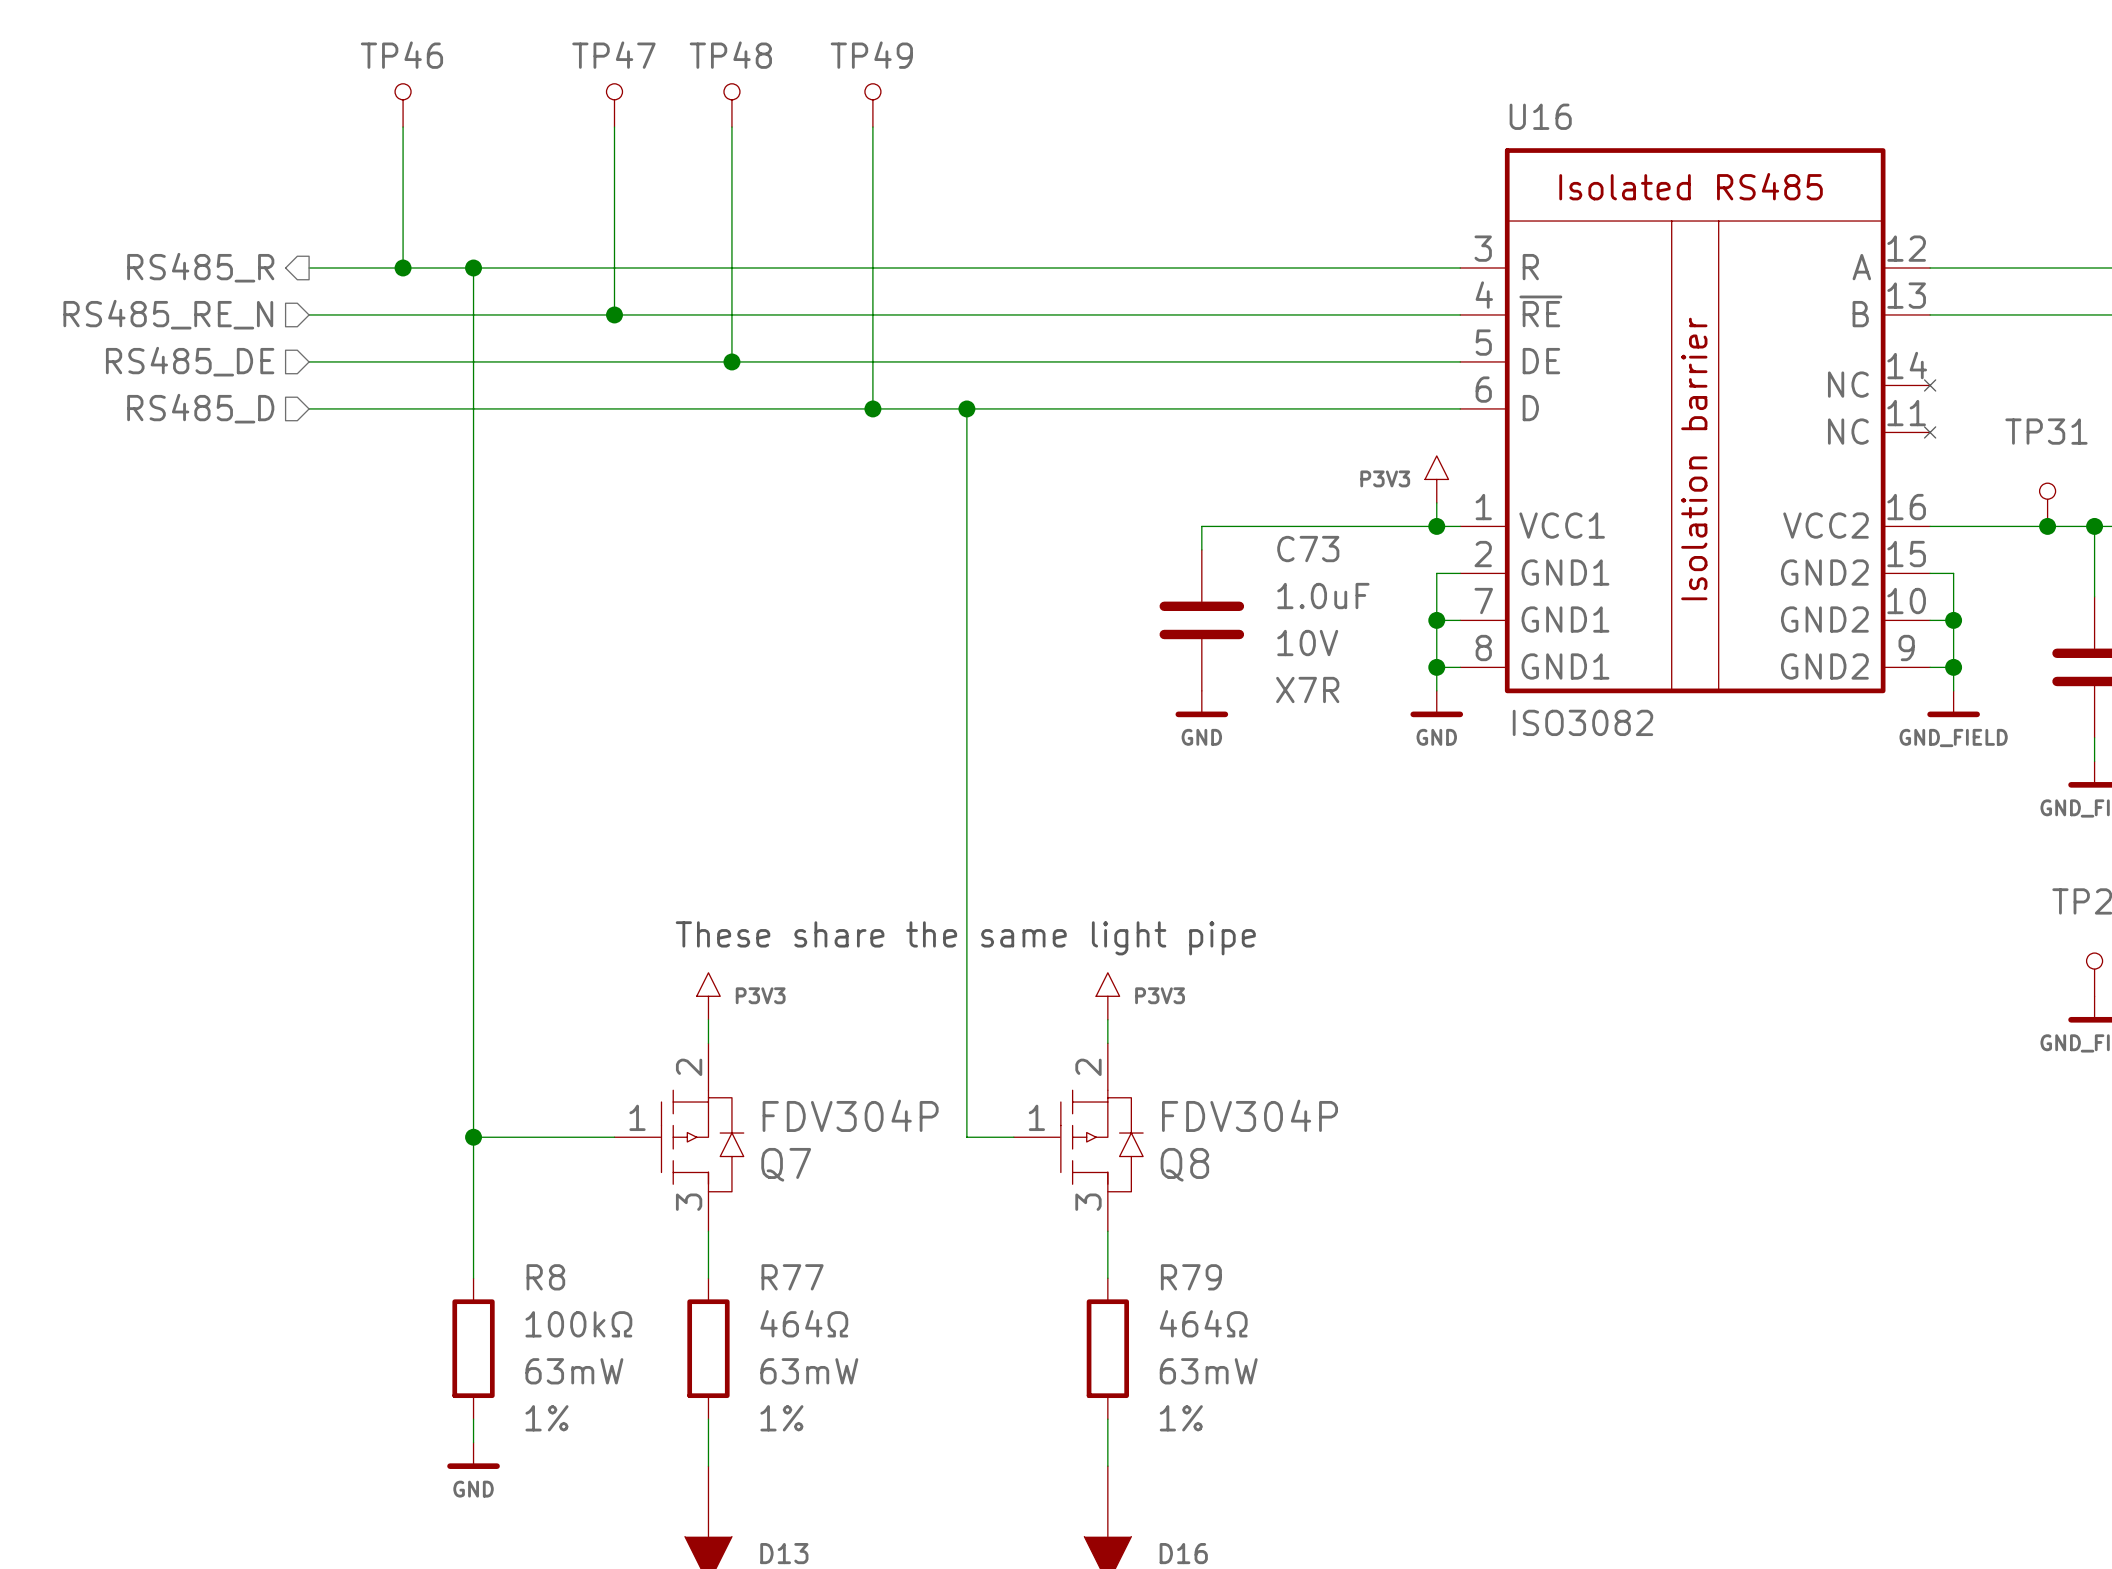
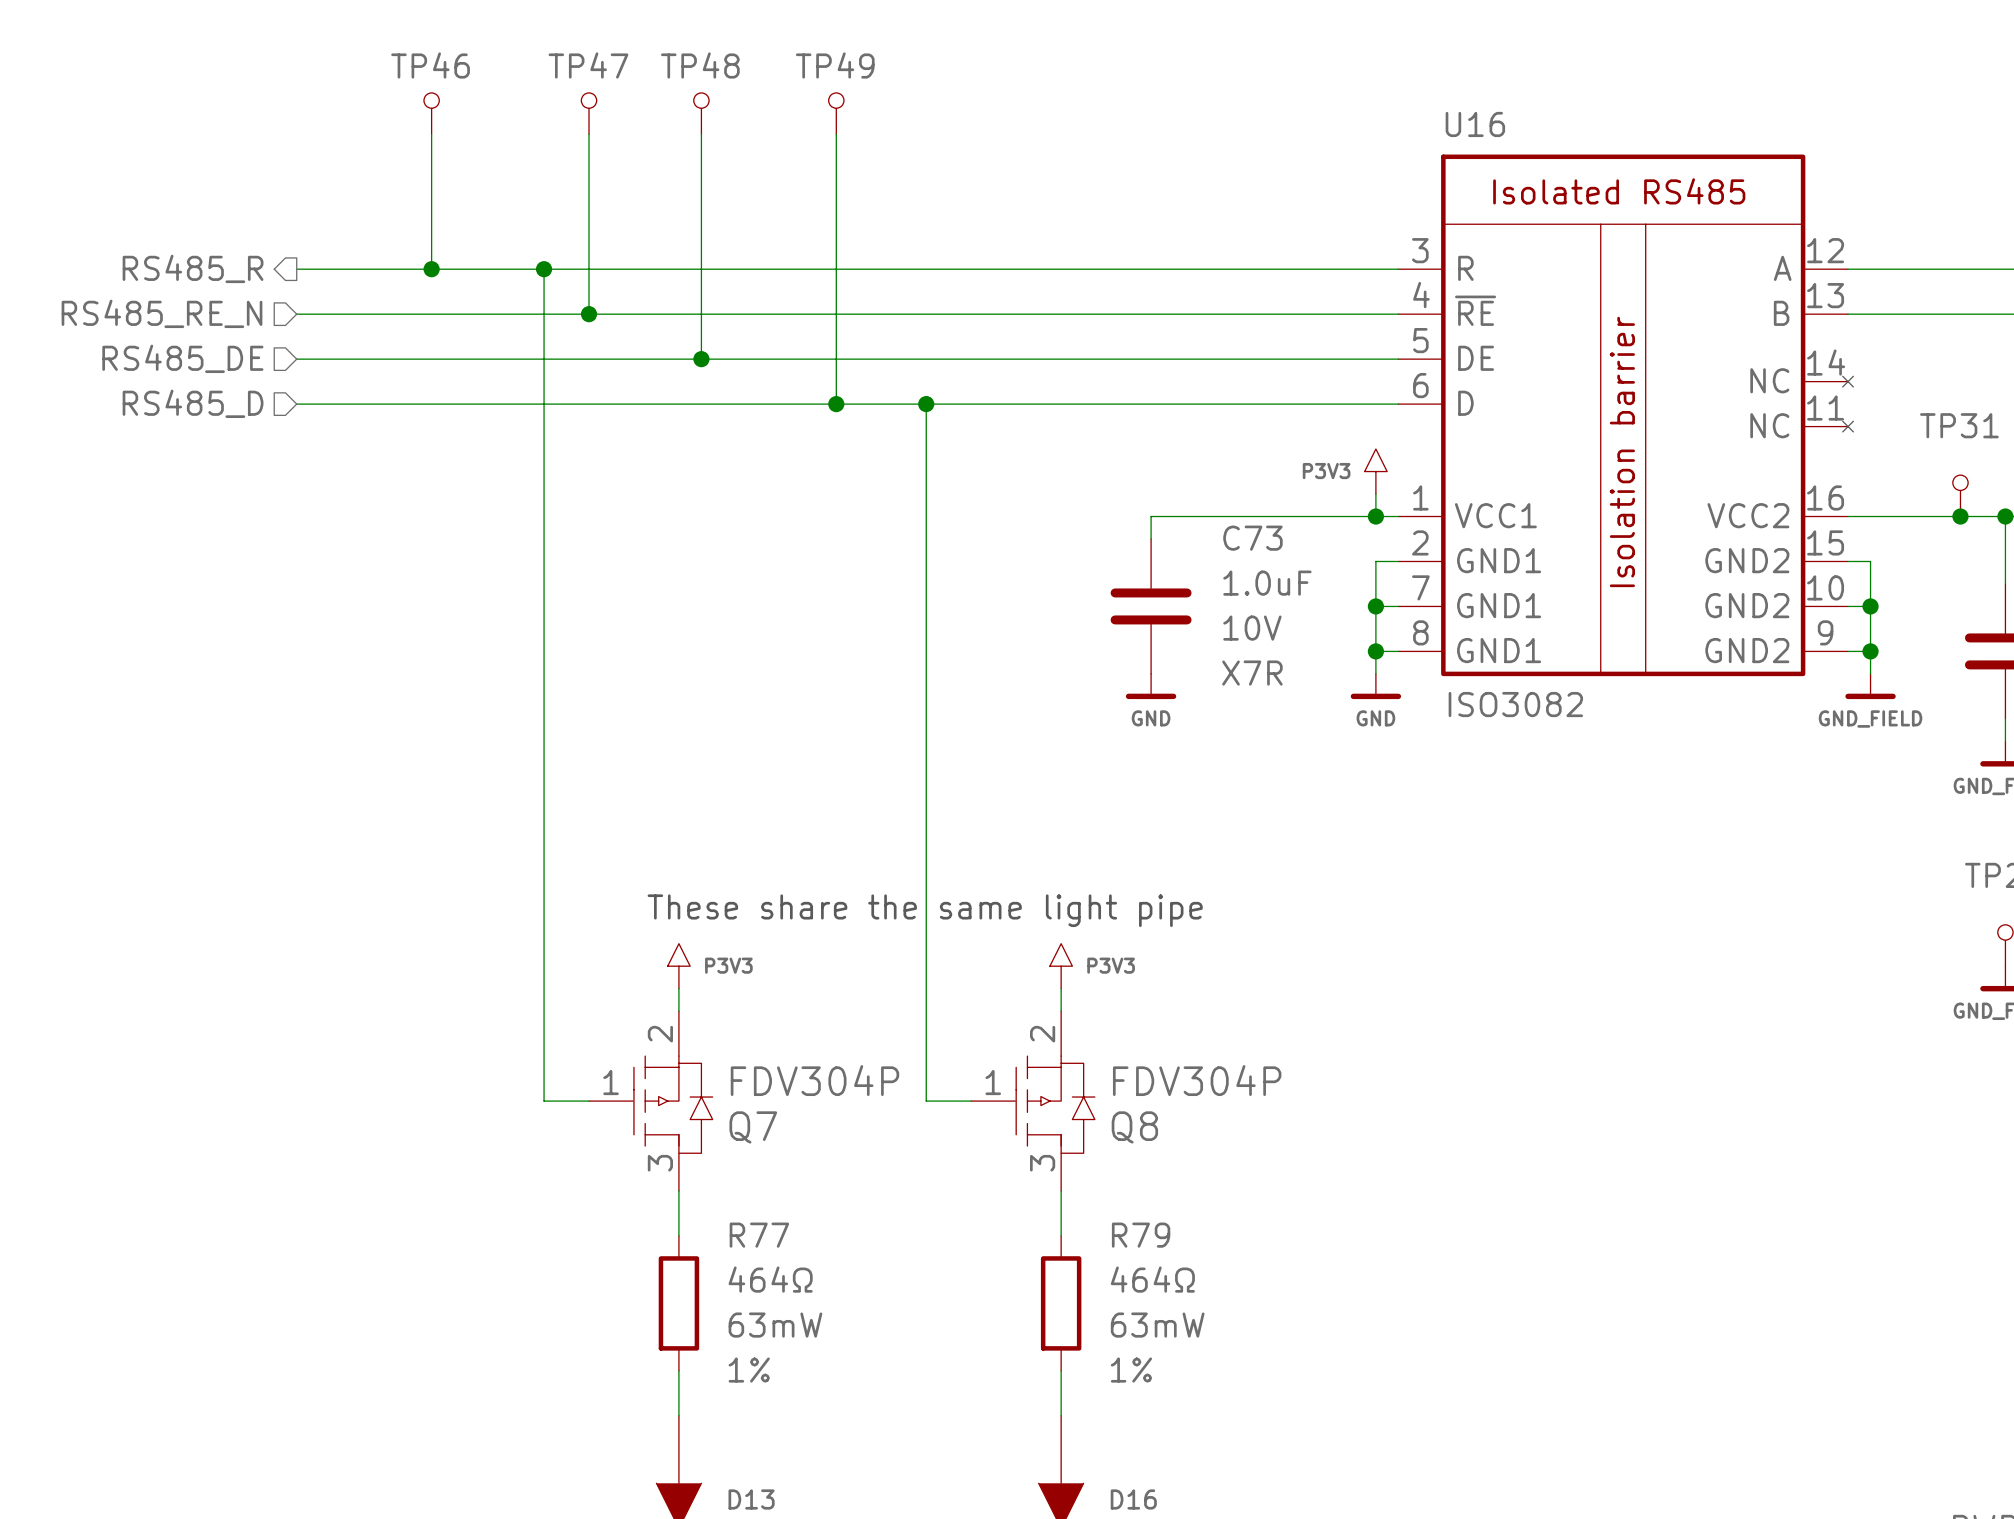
TP46 position: (403, 105) -> (431, 113)
wire: (403, 127) (403, 267) -> (431, 134) (431, 269)
junction: (403, 267) -> none
junction: none -> (431, 269)
wire: (473, 267) (473, 1278) -> none
junction: (473, 267) -> none
junction: none -> (544, 269)
wire: (473, 1137) (567, 1137) -> (544, 269) (544, 1101)
junction: (473, 1137) -> none
R8: 100kΩ (473, 1348) -> none
wire: (473, 1419) (473, 1442) -> none
power symbol: GND (473, 1455) -> none

